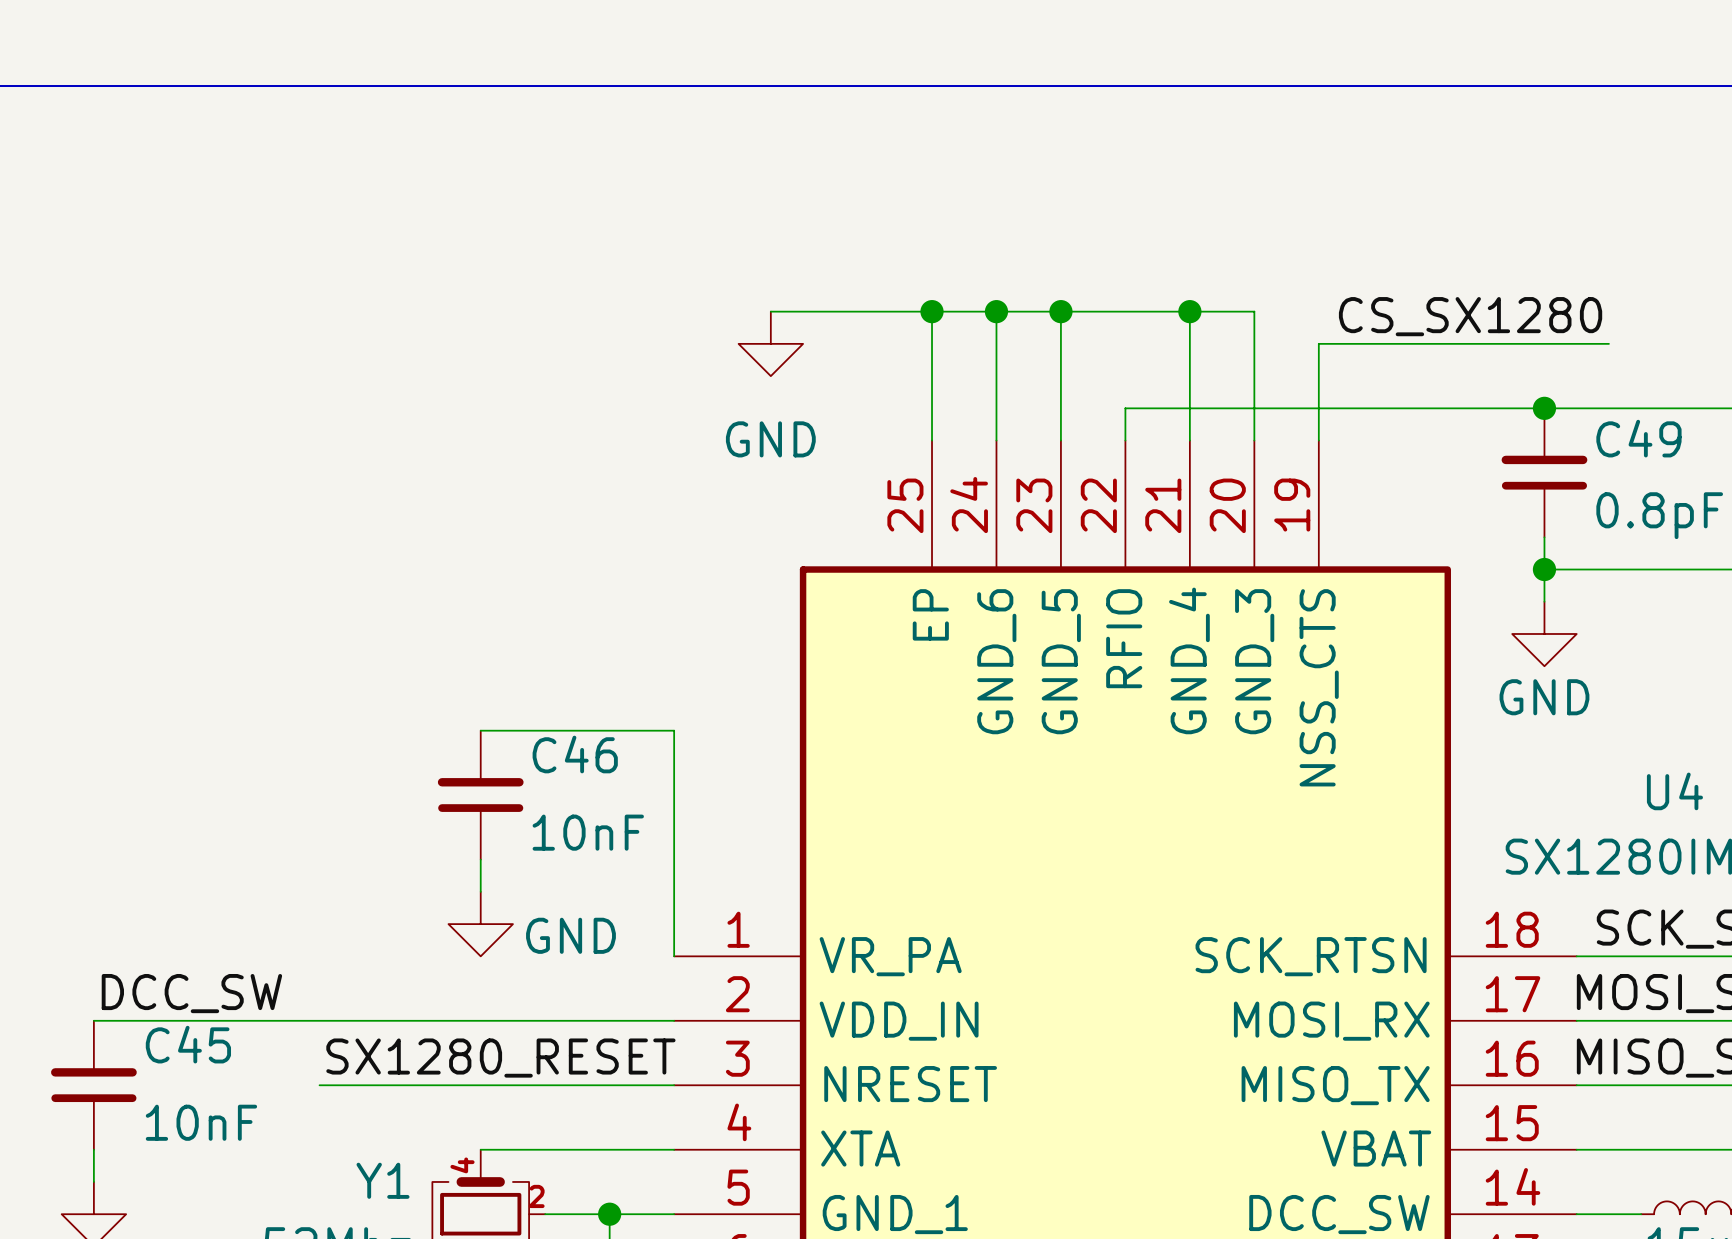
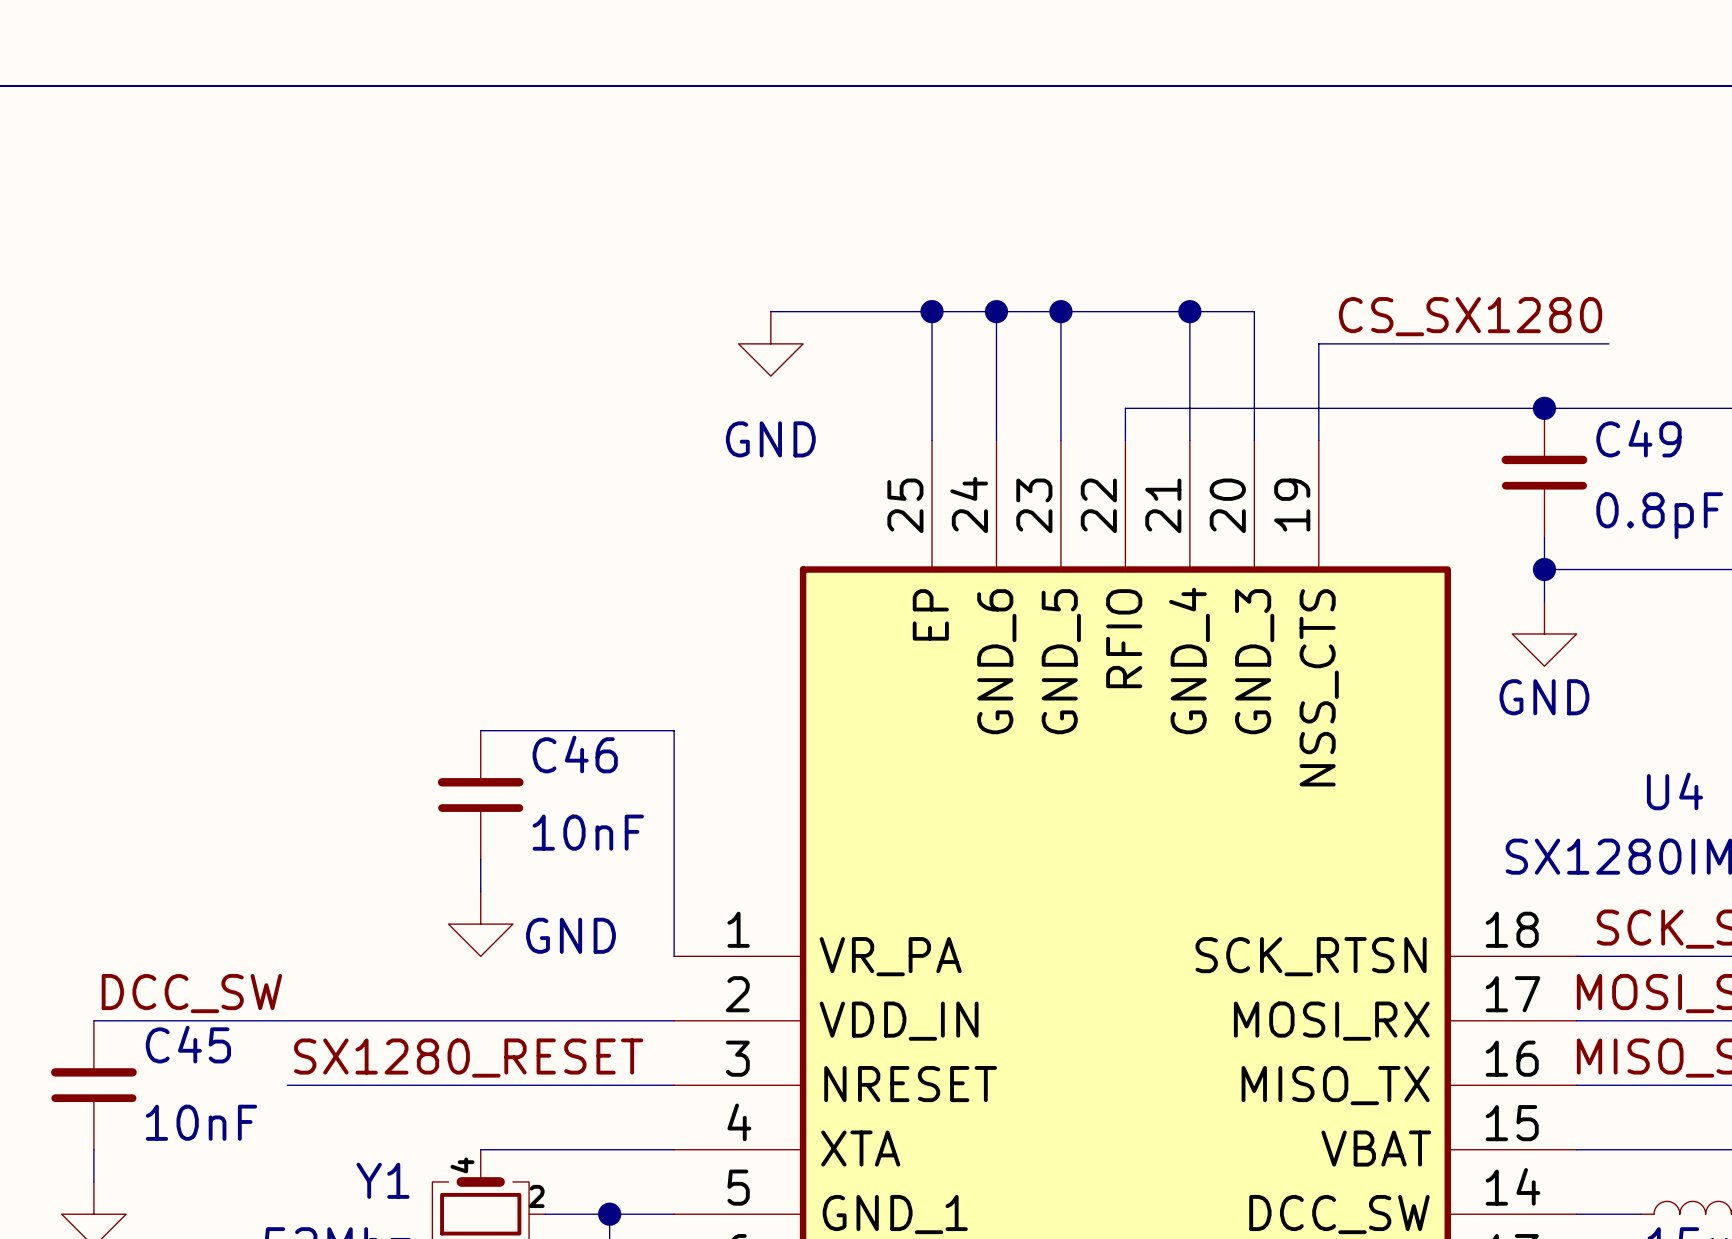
label position: SX1280_RESET (500, 1058) -> SX1280_RESET (468, 1058)
wire: none -> (287, 1085) (319, 1085)

